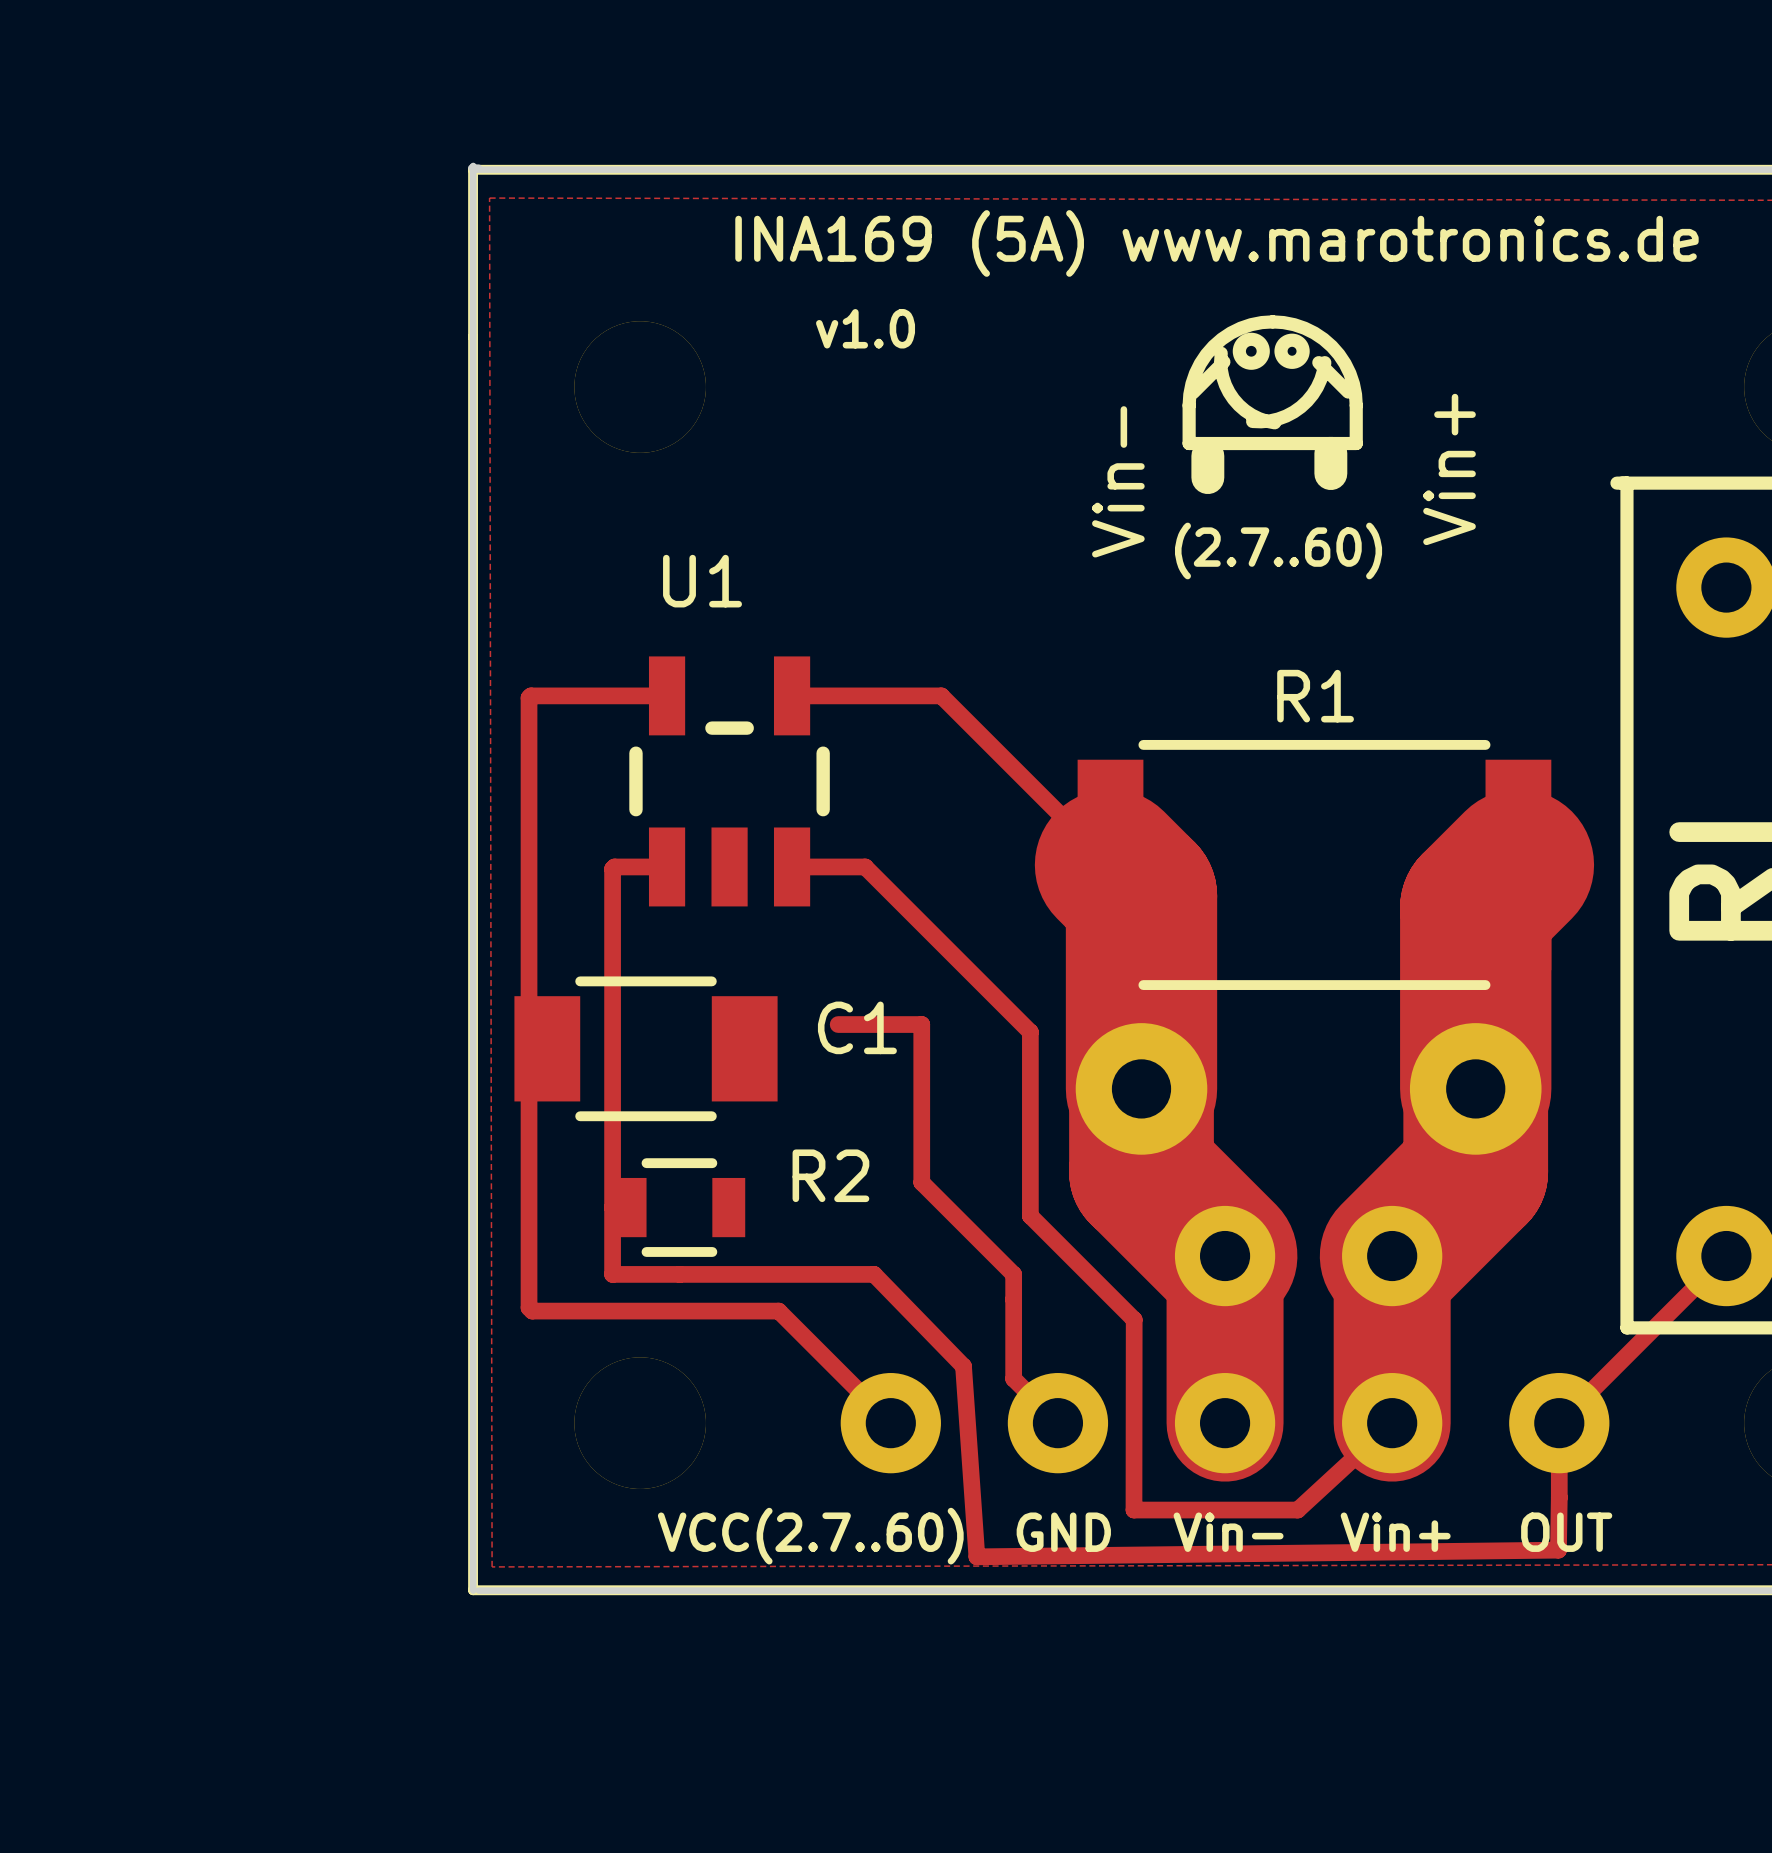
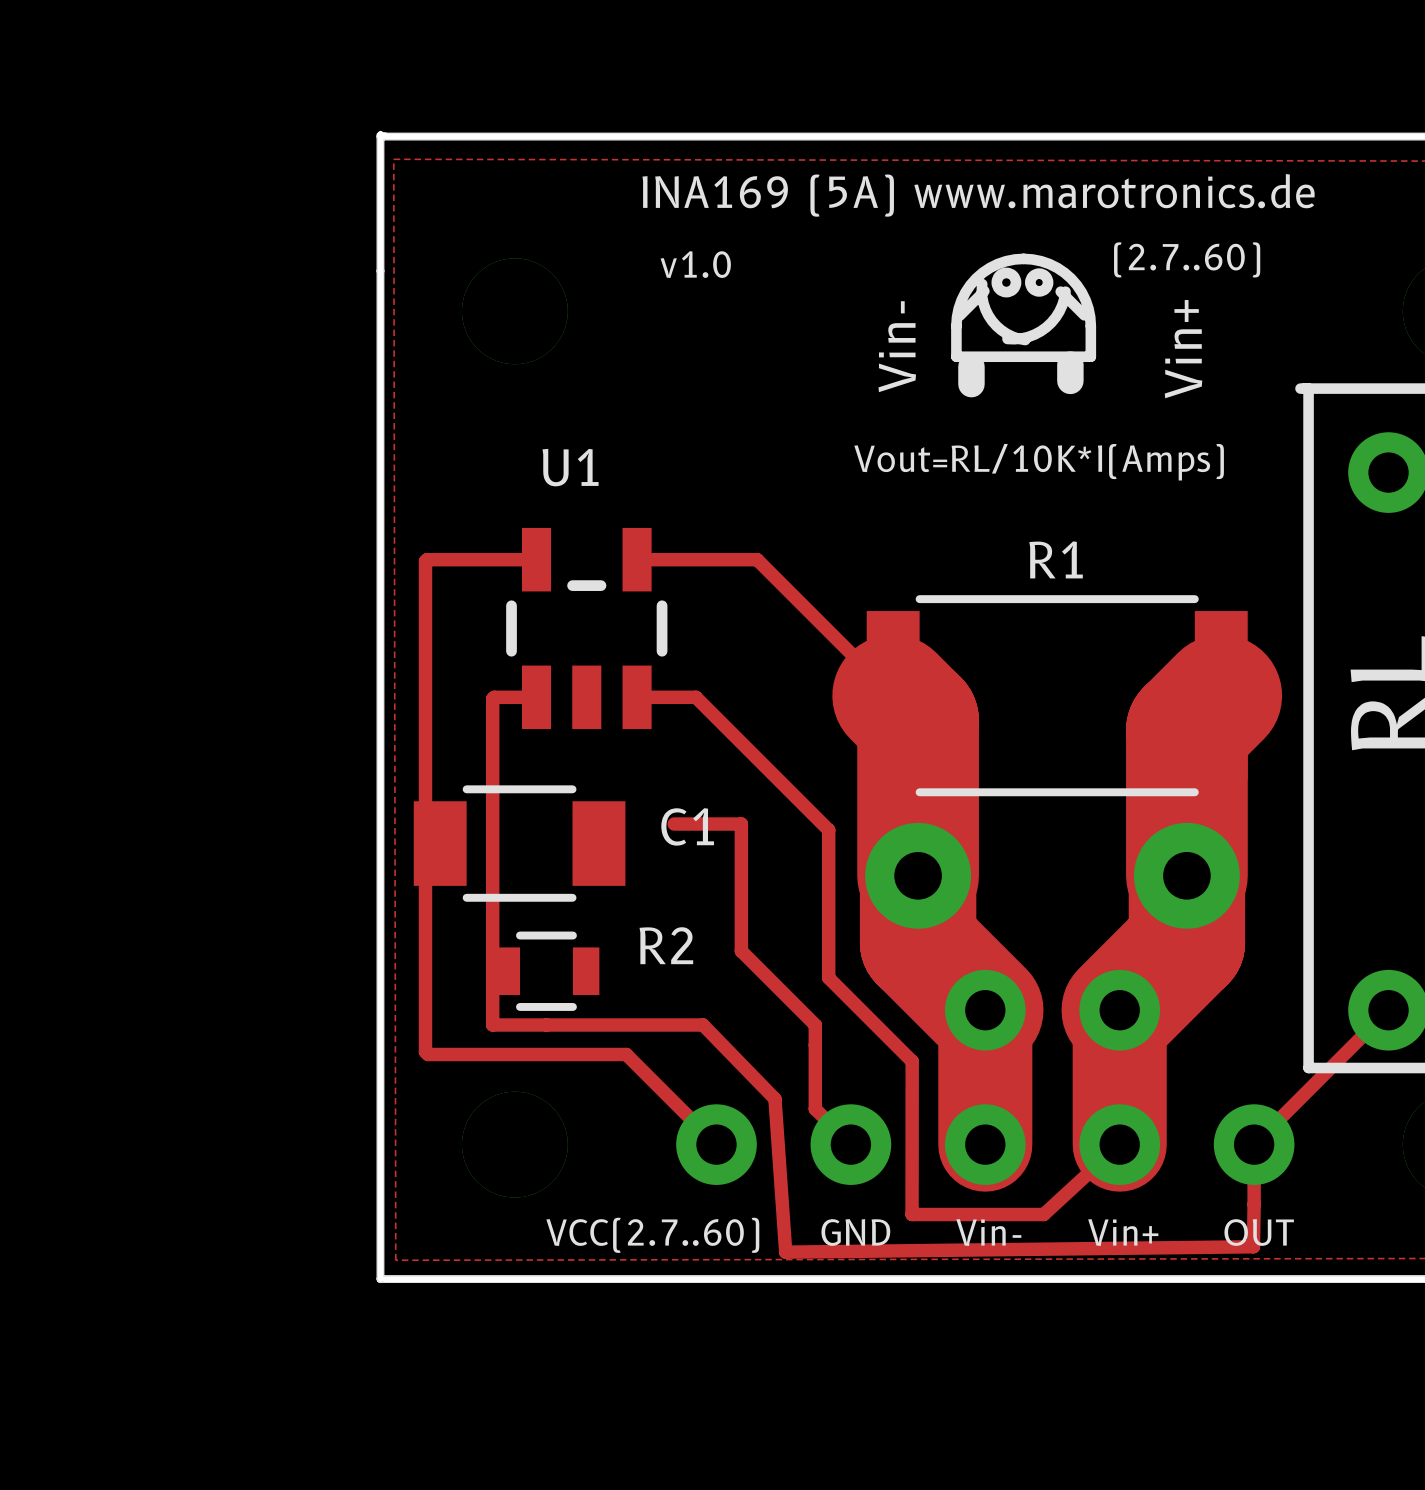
text: none -> (2.7..60) (1187, 259)
text position: Vin+ (1449, 469) -> Vin+ (1183, 349)
text position: Vin- (1118, 481) -> Vin- (897, 346)
text: (2.7..60) (1278, 550) -> Vout=RL/10K*I(Amps) (1039, 462)

